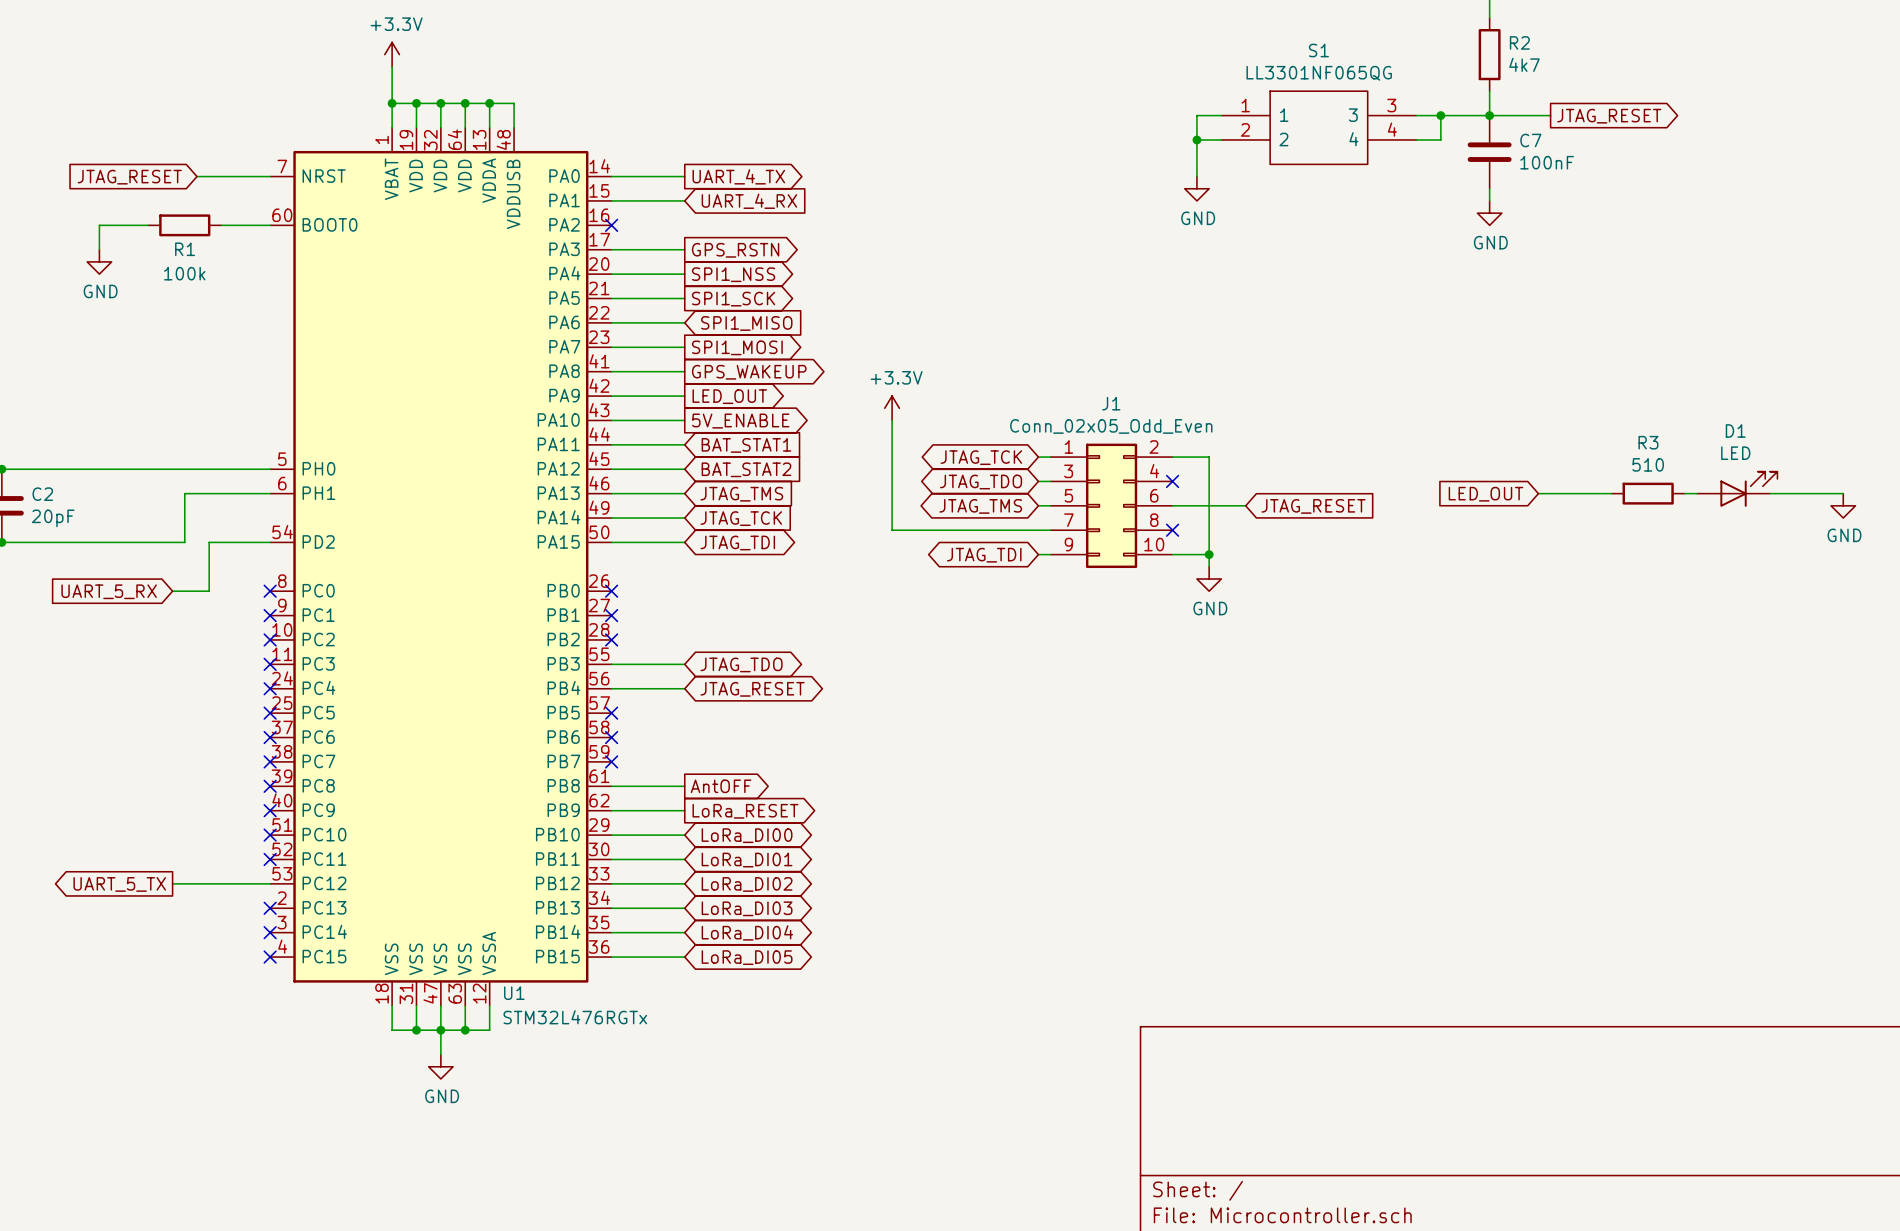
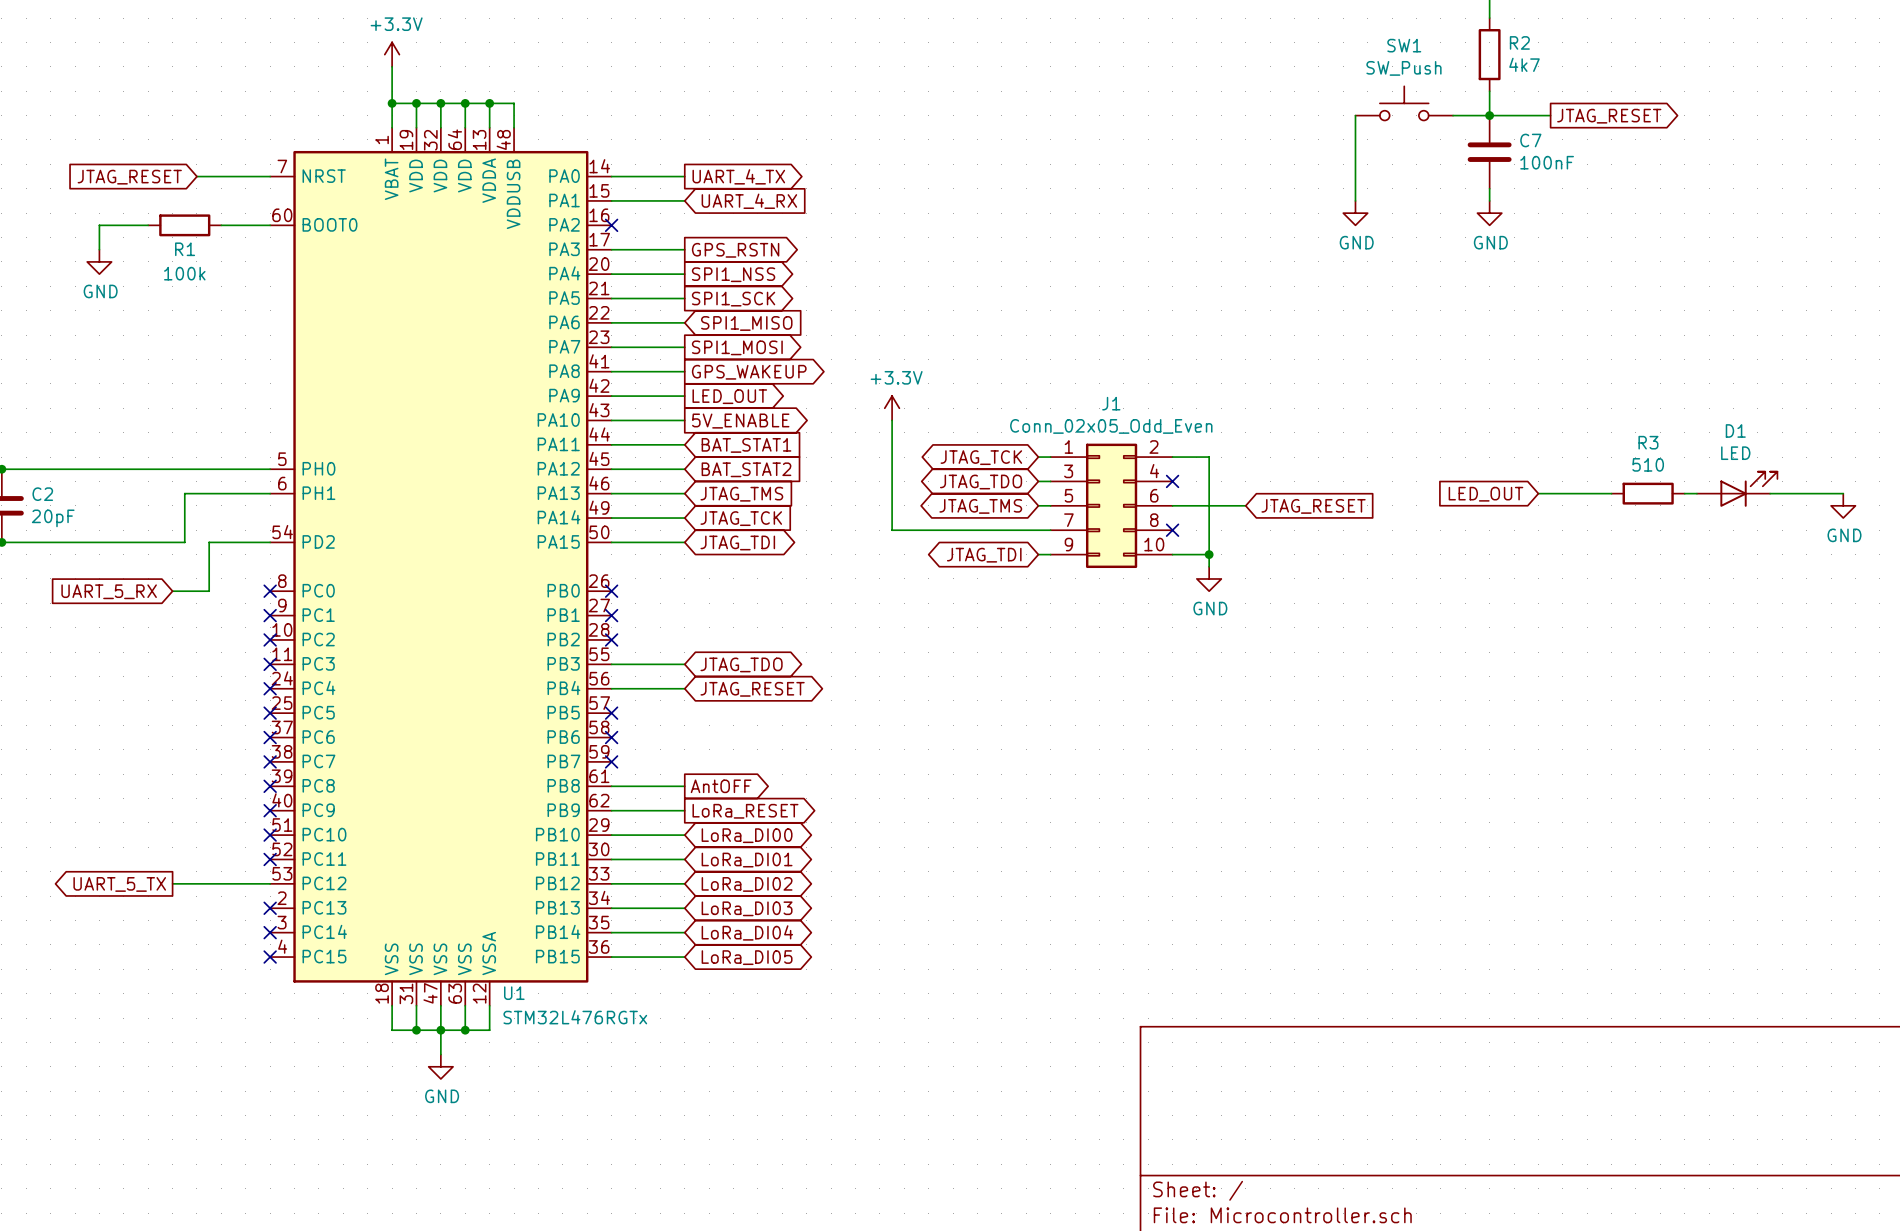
SW1: none -> SW_Push (1404, 103)
wire: (1221, 115) (1196, 115) (1196, 176) -> none
wire: none -> (1355, 115) (1355, 200)
wire: (1440, 115) (1440, 139) (1416, 139) -> none
junction: (1440, 115) -> none
S1: LL3301NF065QG (1318, 127) -> none
wire: (1196, 139) (1221, 139) -> none
junction: (1196, 139) -> none
power symbol position: GND (1196, 188) -> GND (1355, 213)

